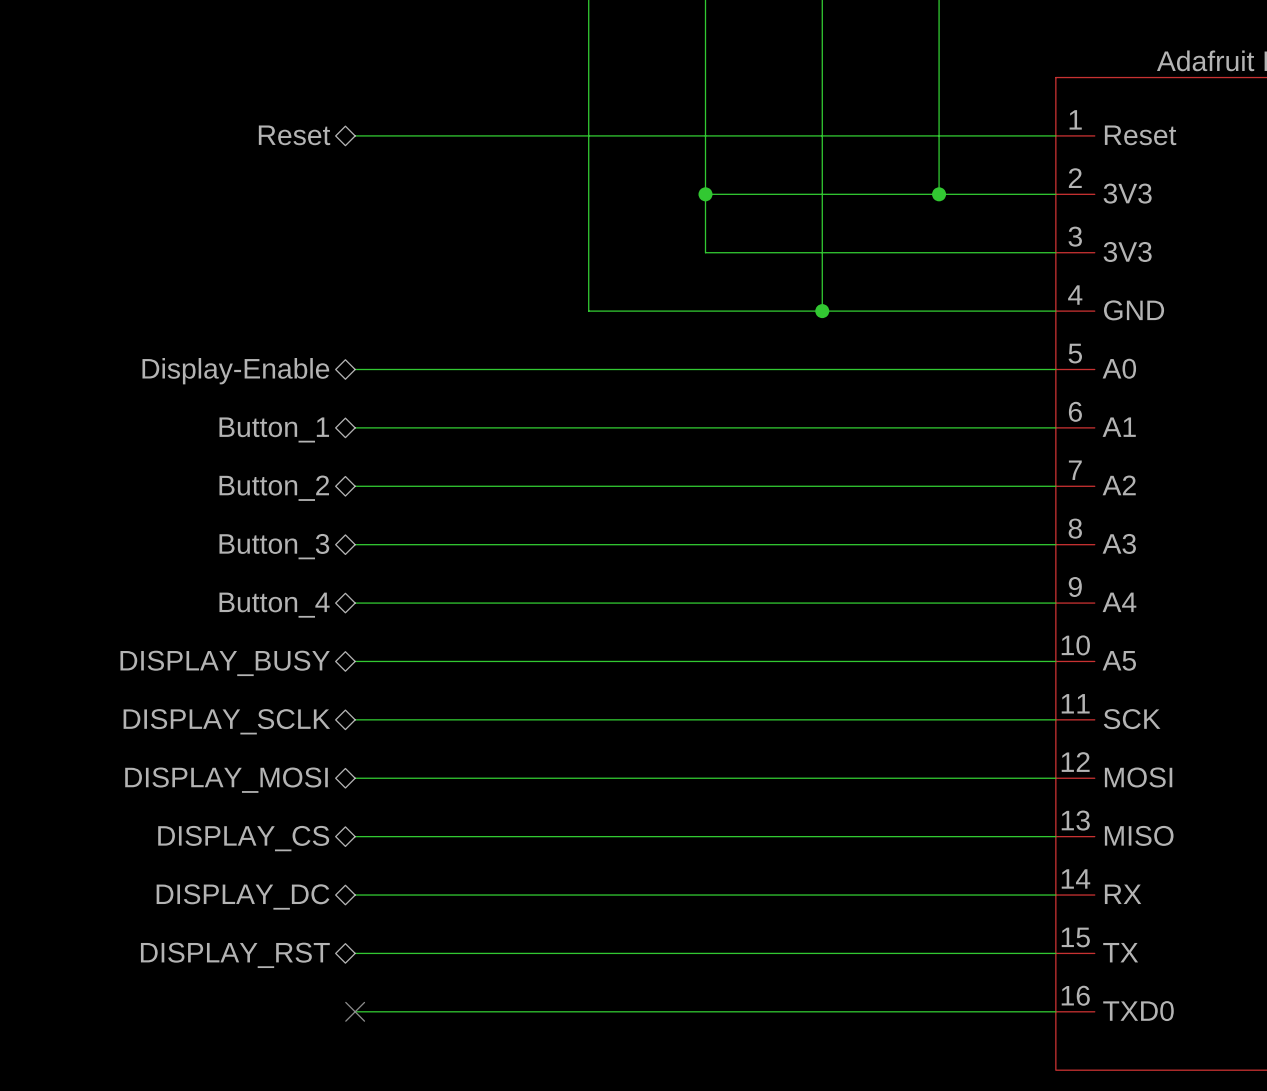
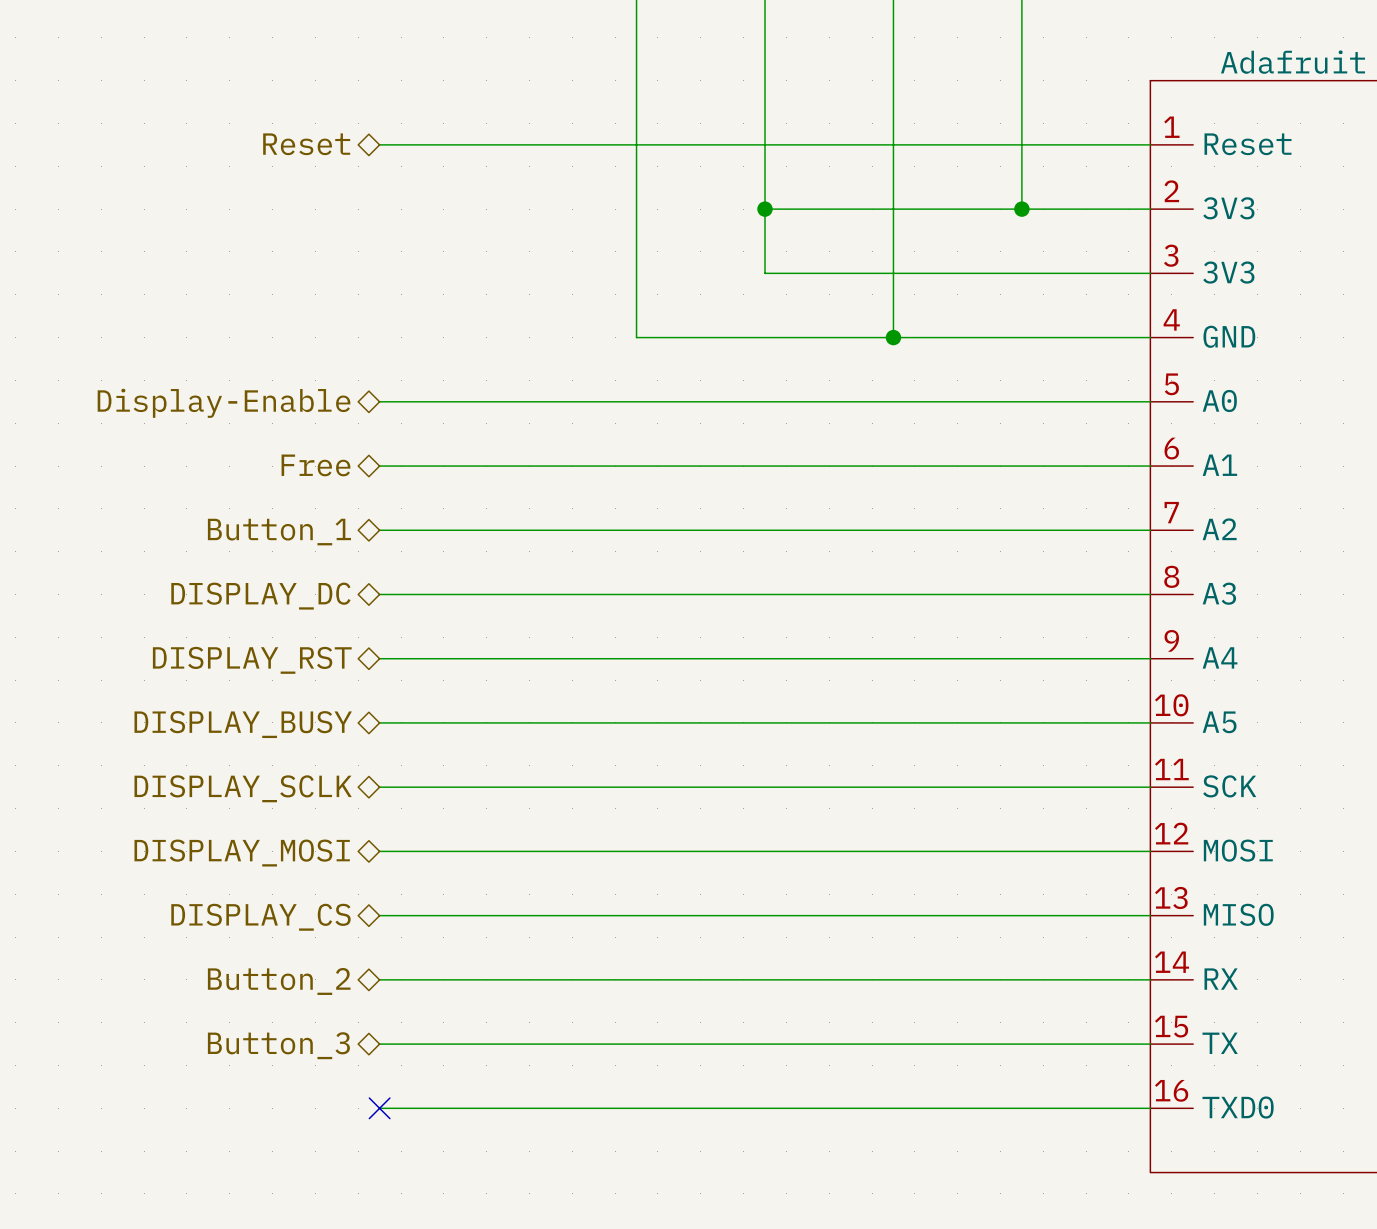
hierarchical label: Button_1 (274, 429) -> Free (315, 465)
hierarchical label: Button_2 (274, 488) -> Button_1 (279, 532)
hierarchical label: Button_3 (274, 546) -> DISPLAY_DC (260, 596)
hierarchical label: Button_4 (274, 605) -> DISPLAY_RST (252, 660)
hierarchical label: DISPLAY_DC (243, 896) -> Button_2 (279, 981)
hierarchical label: DISPLAY_RST (235, 955) -> Button_3 (278, 1045)

